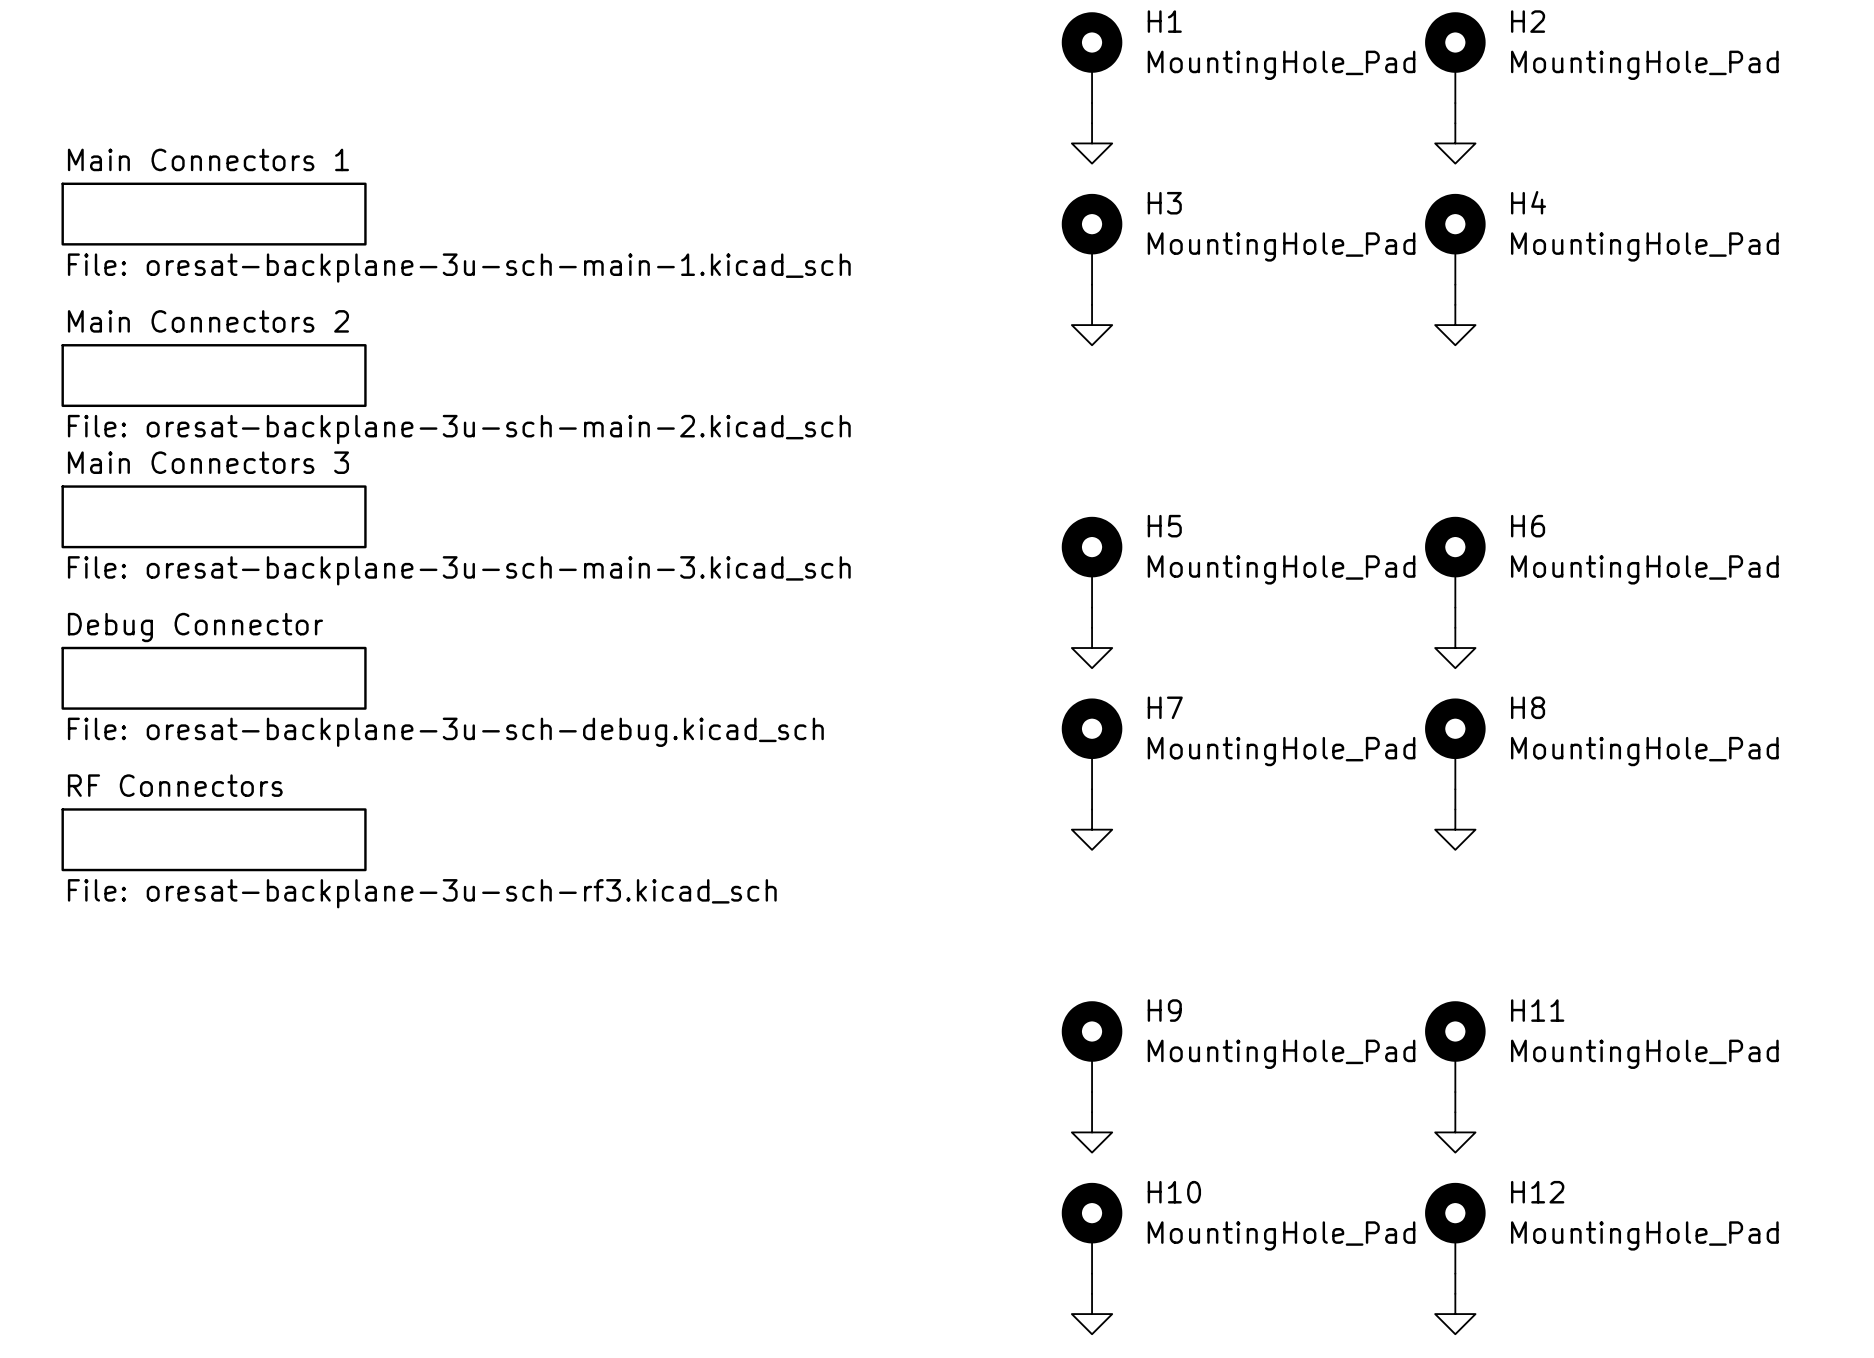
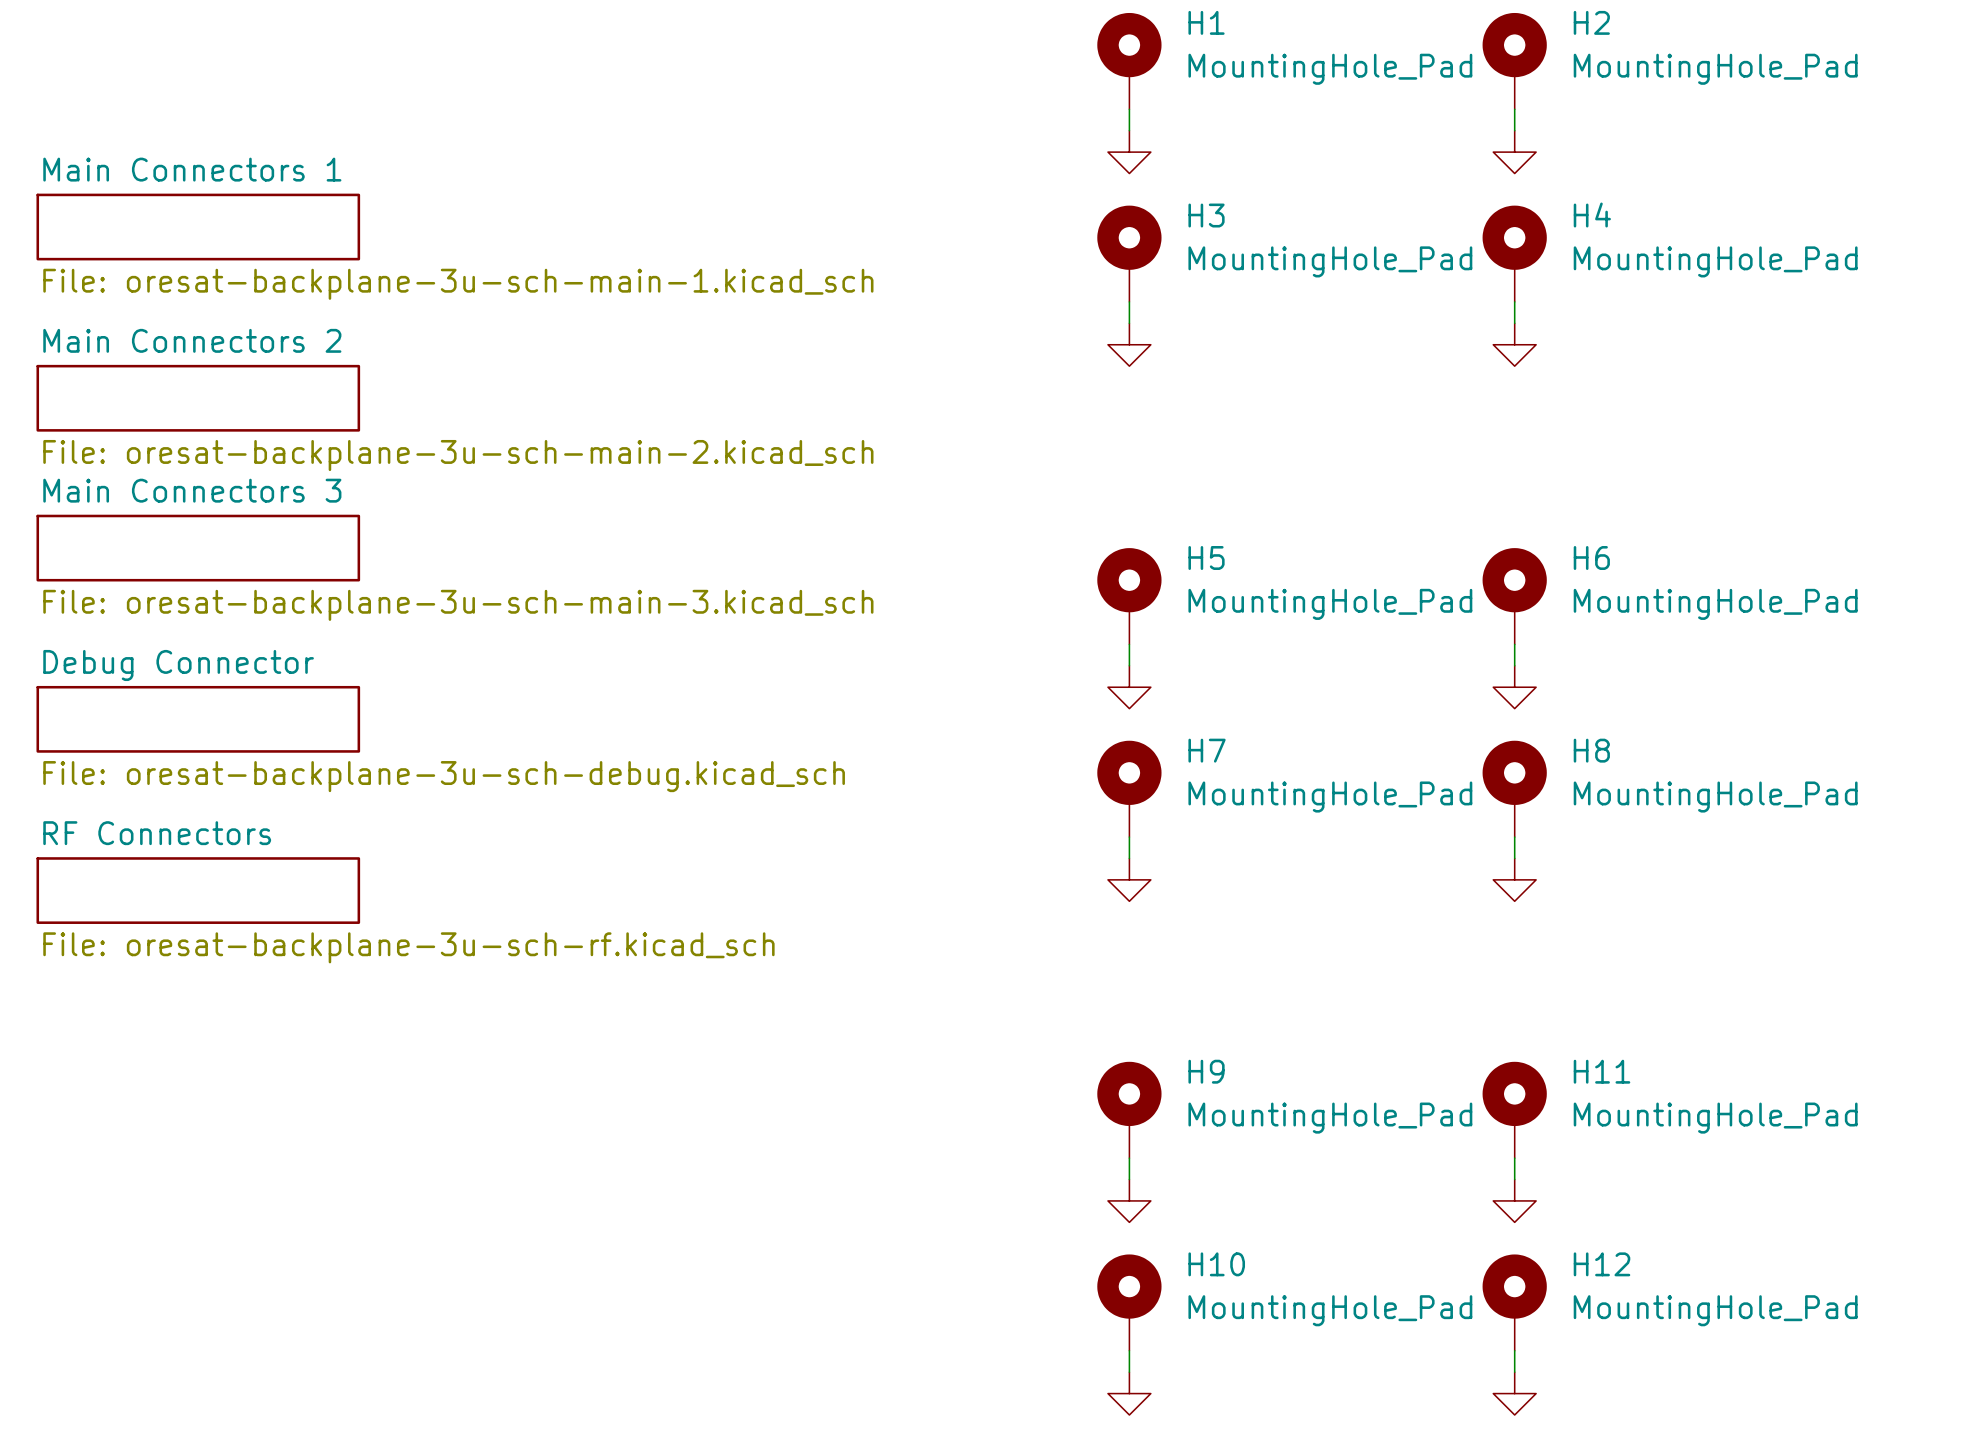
sheet RF Connectors value: File: oresat-backplane-3u-sch-rf3.kicad_sch (422, 893) -> File: oresat-backplane-3u-sch-rf.kicad_sch (408, 947)

